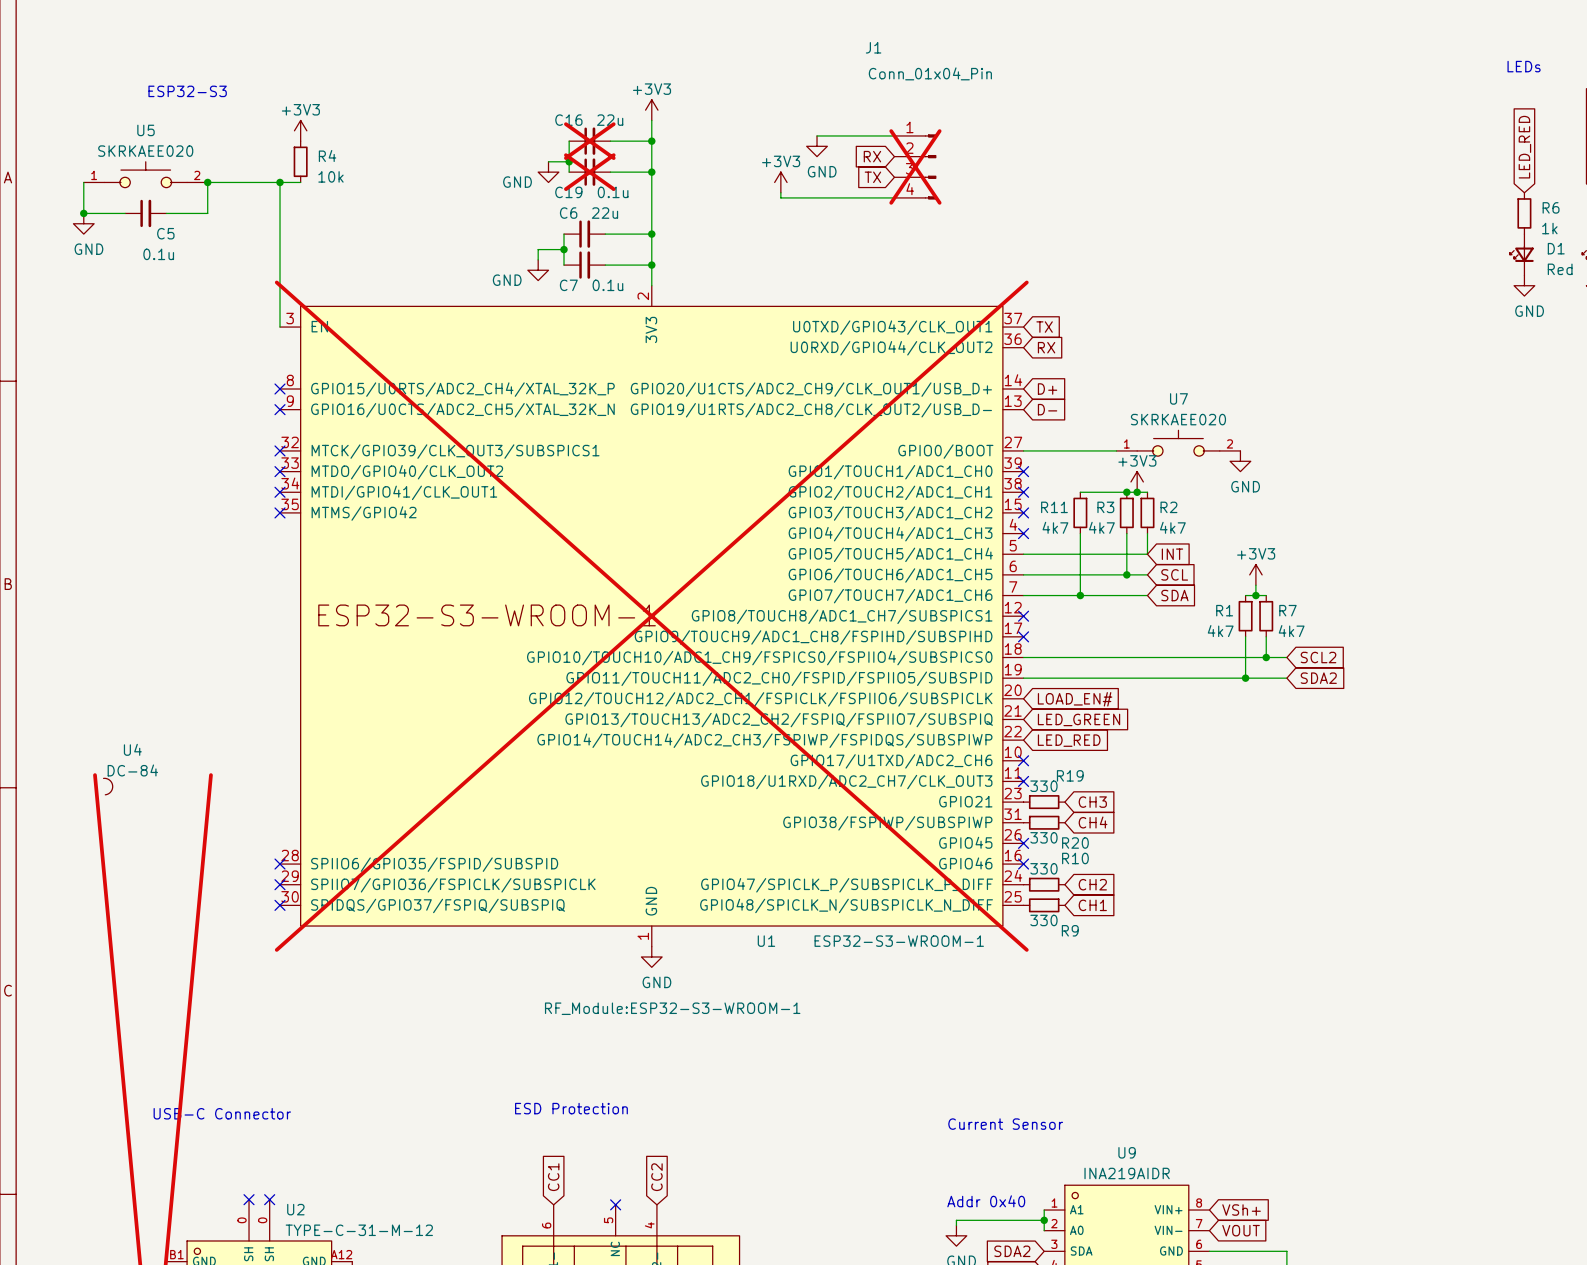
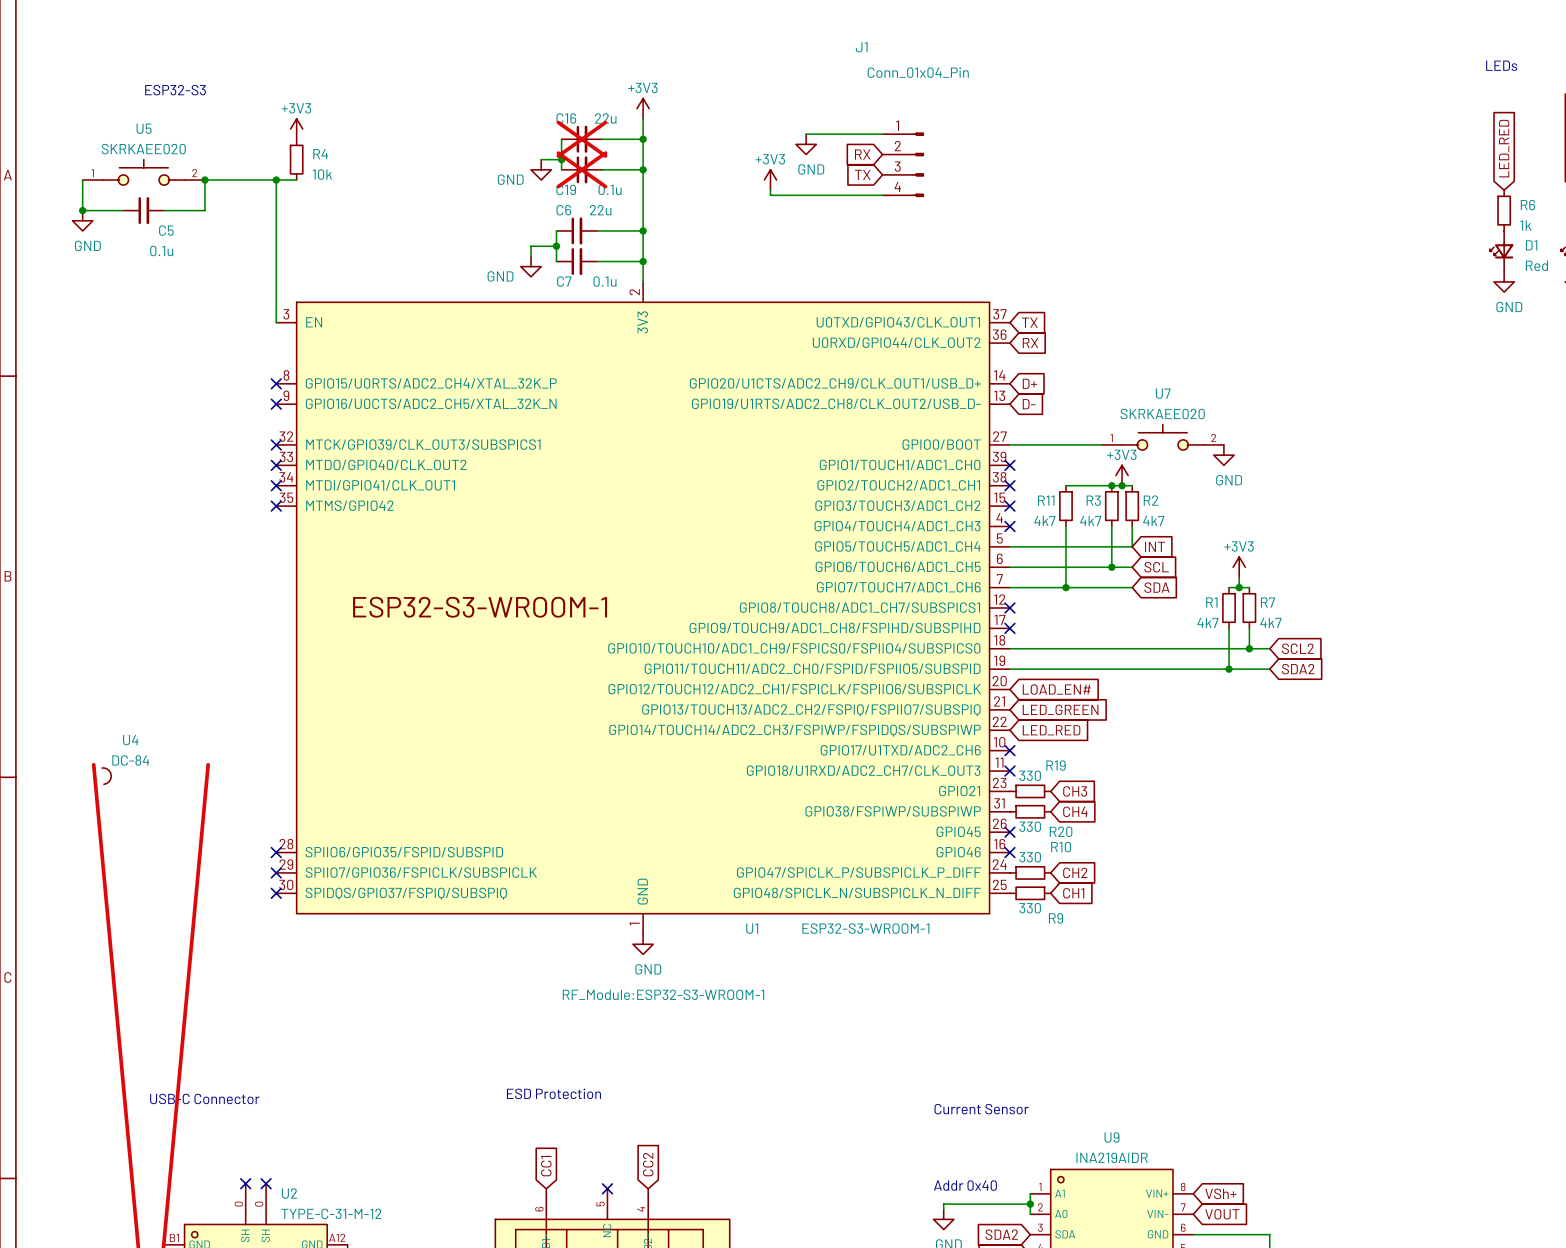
J1 do-not-place cross: (915, 166) -> none
U1 do-not-place cross: (651, 616) -> none

